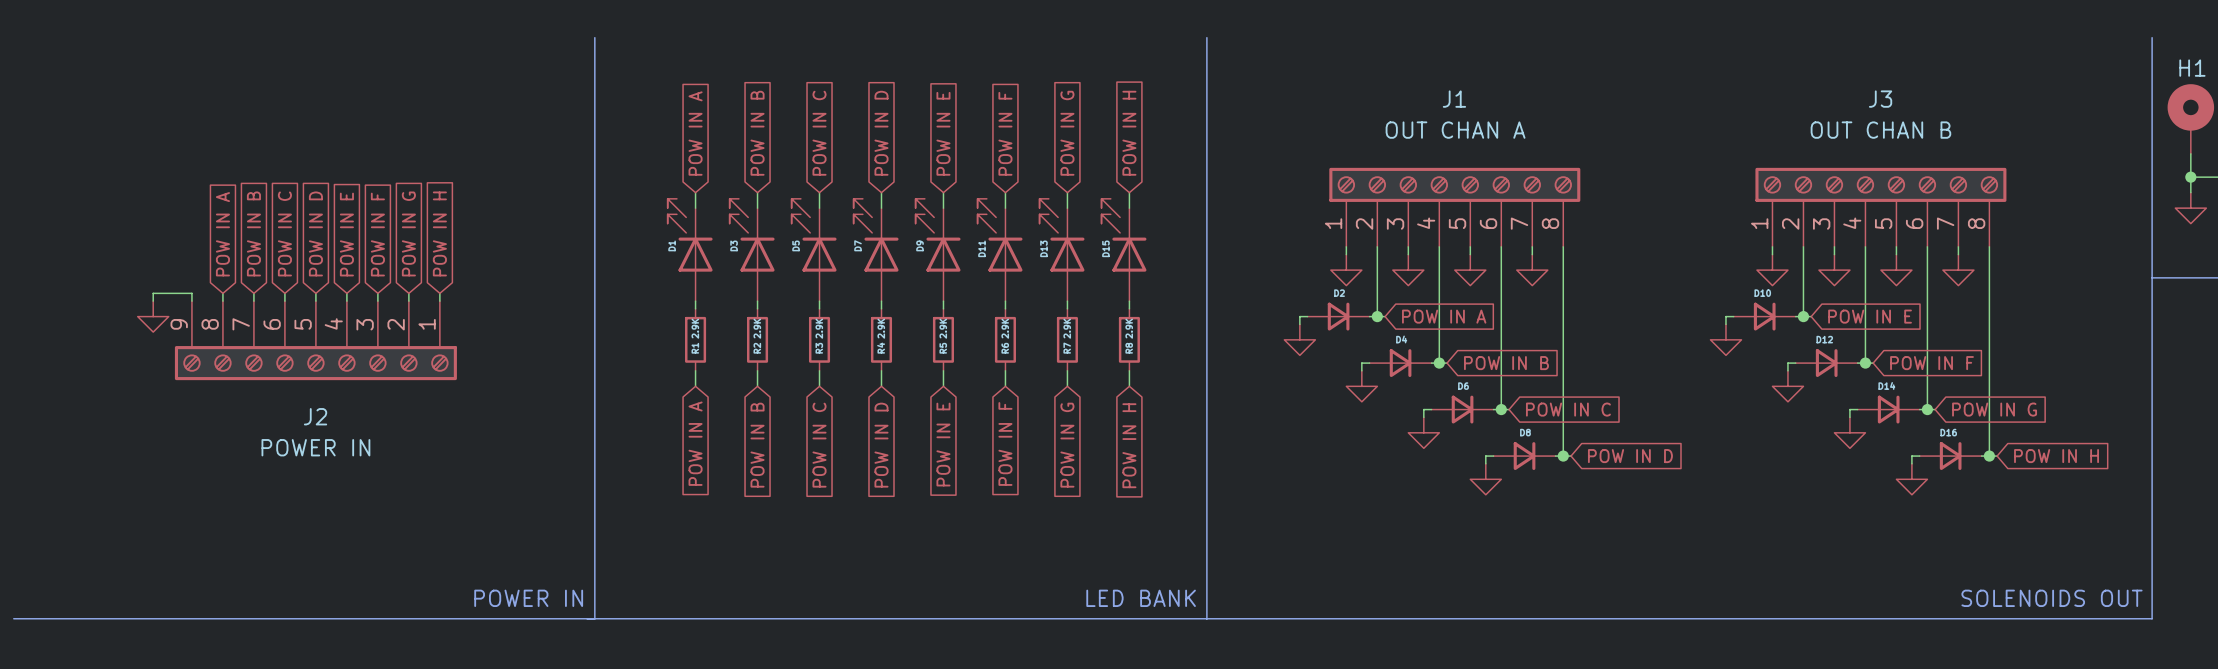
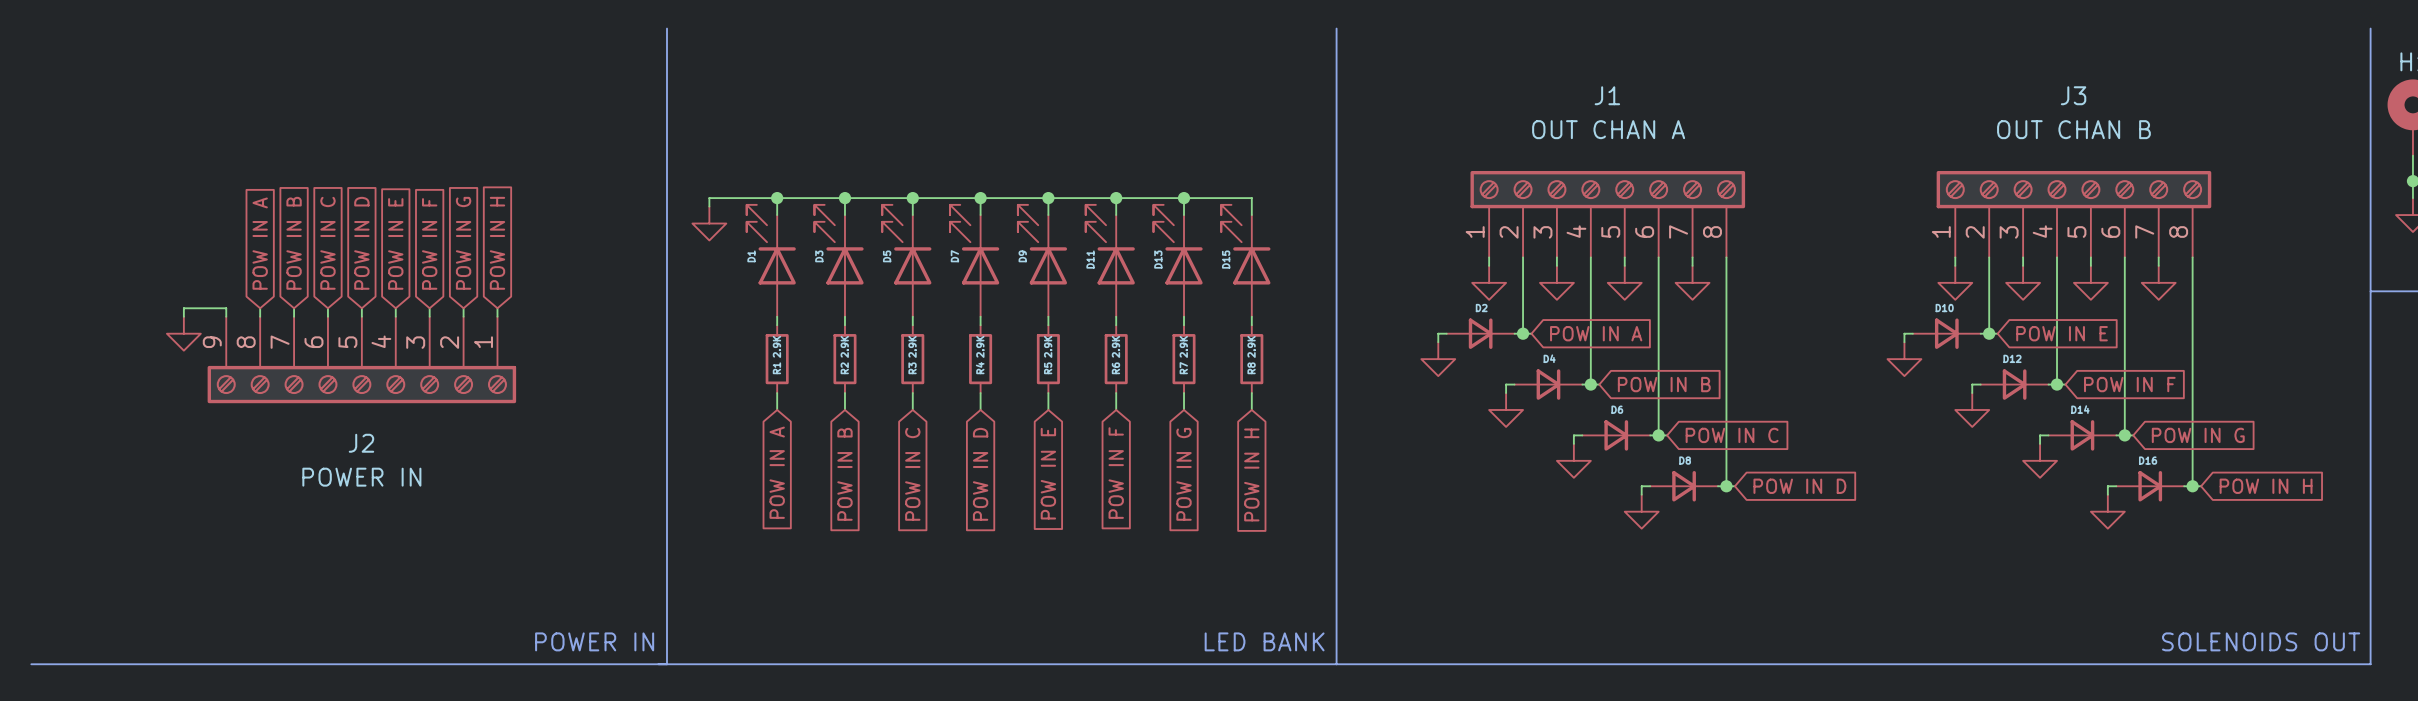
global label: POW IN A (695, 133) -> none
global label: POW IN B (757, 133) -> none
global label: POW IN C (819, 133) -> none
global label: POW IN D (881, 133) -> none
global label: POW IN E (943, 133) -> none
global label: POW IN F (1005, 133) -> none
global label: POW IN G (1067, 133) -> none
global label: POW IN H (1129, 133) -> none
junction: none -> (777, 198)
junction: none -> (844, 198)
junction: none -> (912, 198)
junction: none -> (980, 198)
junction: none -> (1048, 198)
junction: none -> (1116, 198)
junction: none -> (1184, 198)
wire: none -> (1251, 198) (709, 198) (709, 206)
power symbol: none -> (709, 223)

